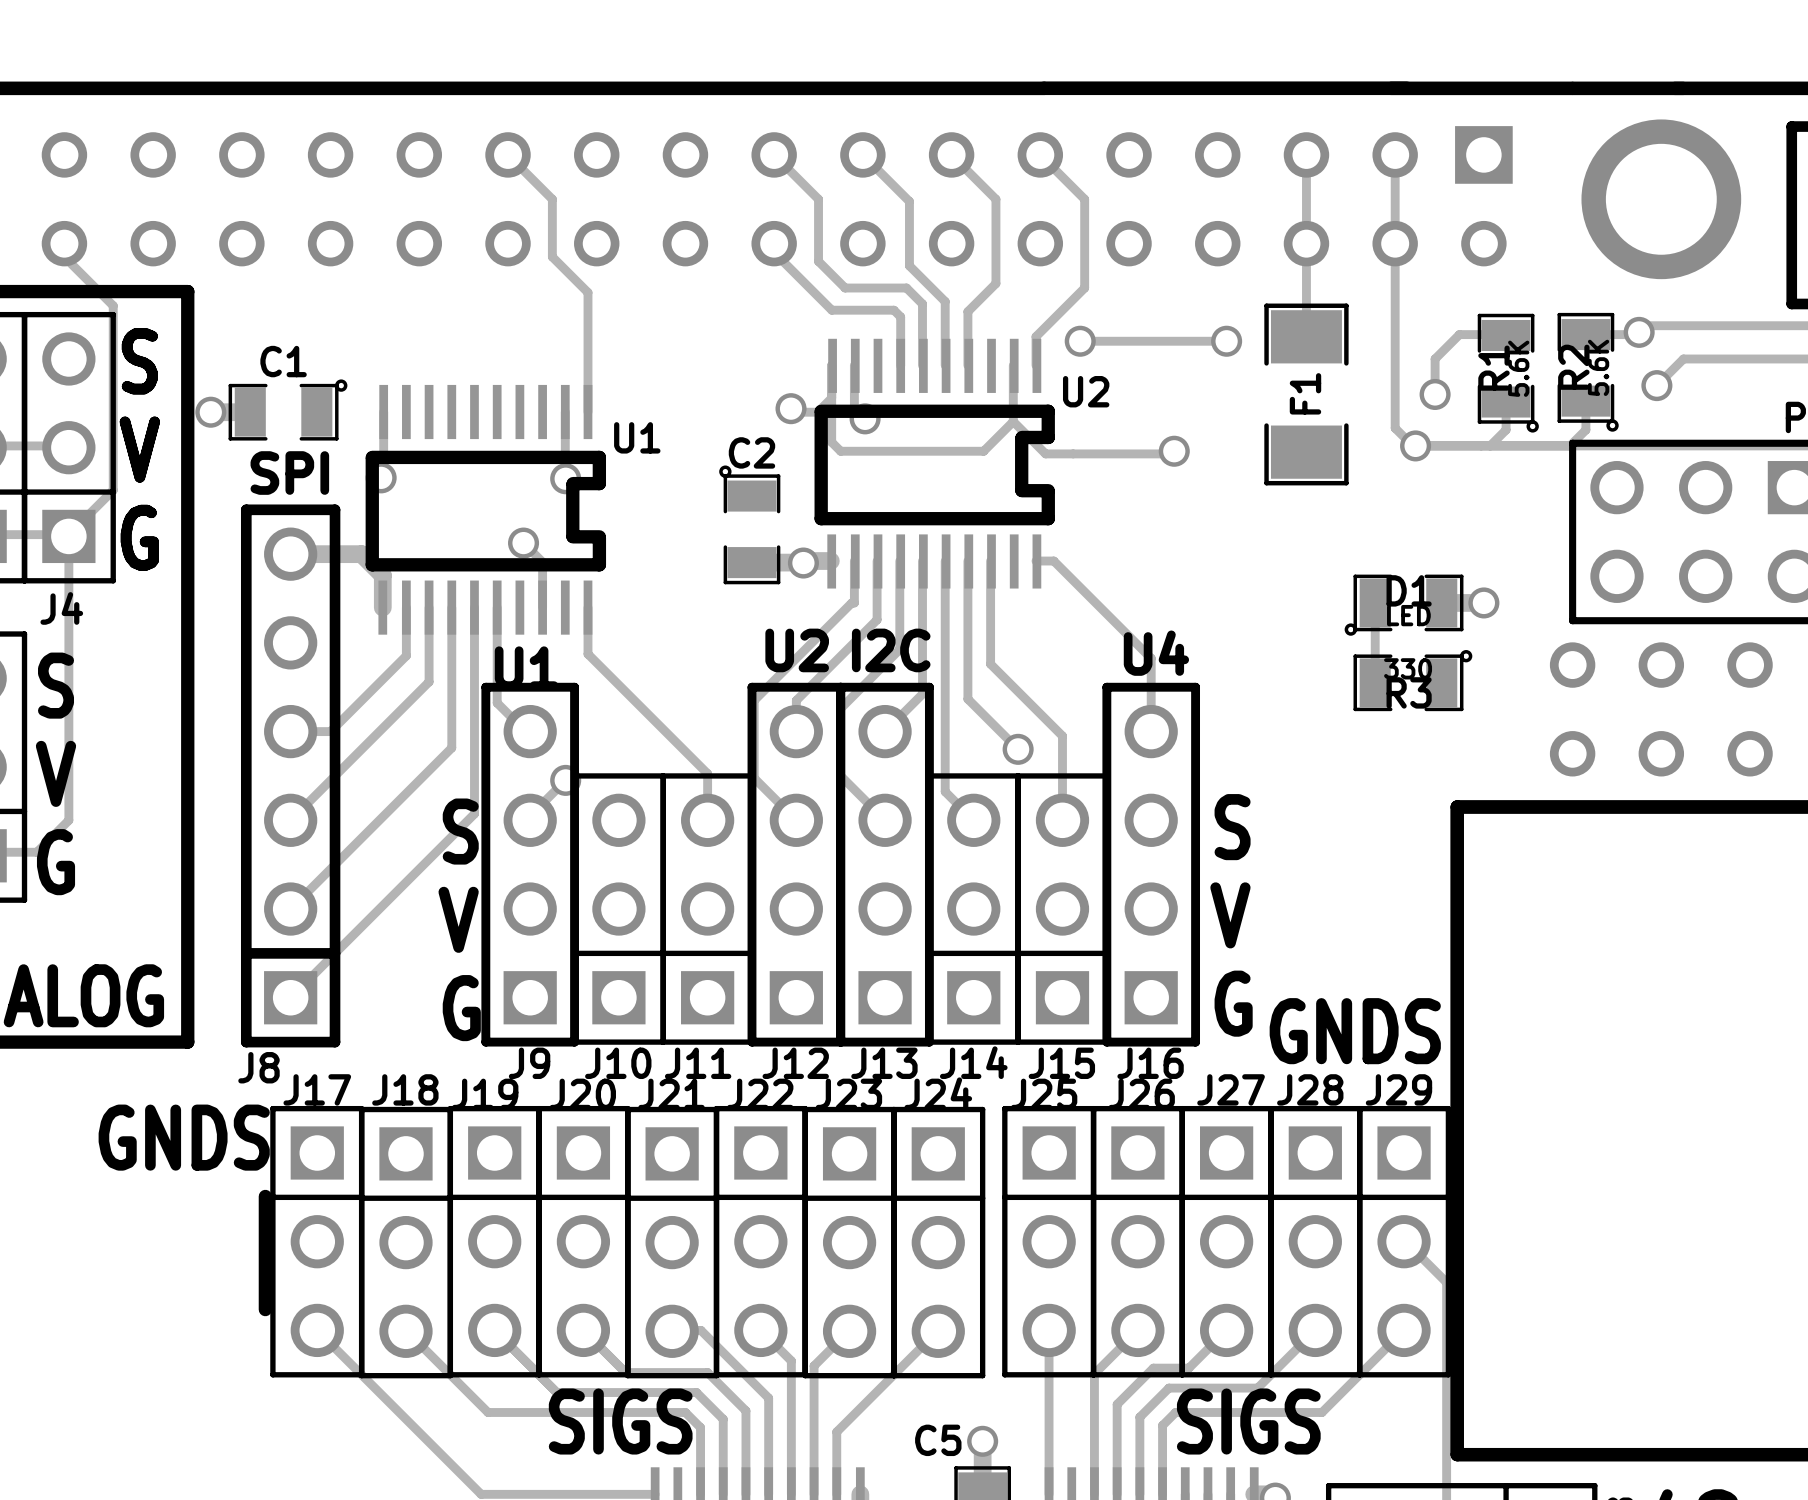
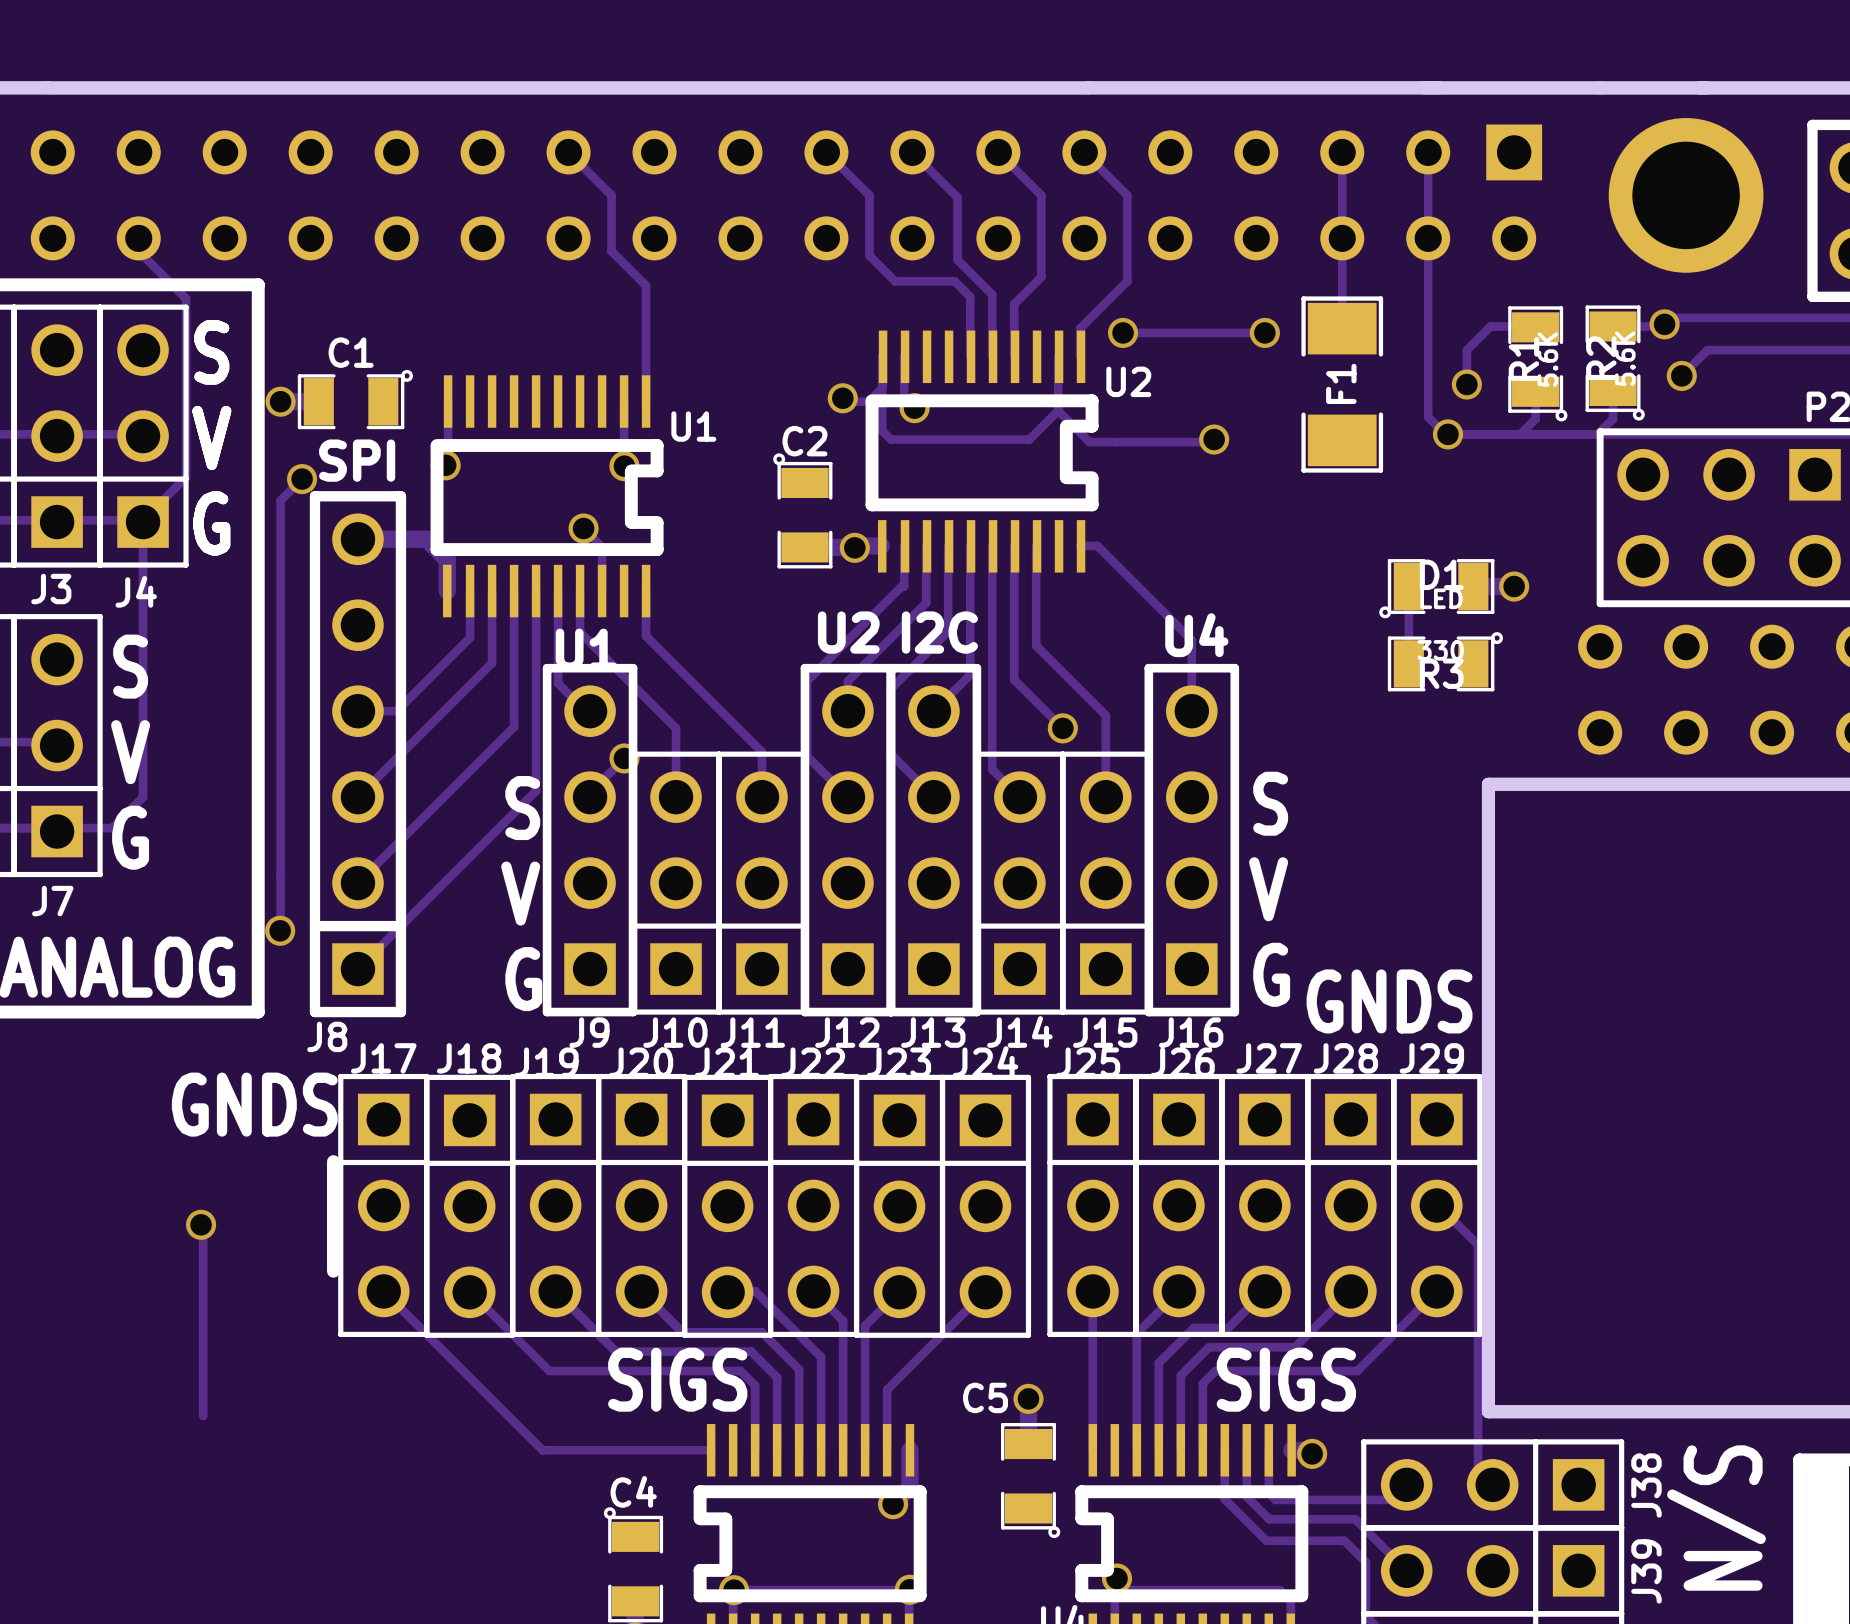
track: (774, 243) (774, 252) (831, 310) (893, 310) (900, 316) (900, 365) -> none
track: none -> (302, 479) (280, 500) (280, 930)
via: none -> (302, 479)
track: none -> (580, 591) (580, 632) (676, 728) (676, 799)
via: none -> (280, 930)
track: none -> (201, 1224) (203, 1226) (203, 1416)
via: none -> (201, 1224)

